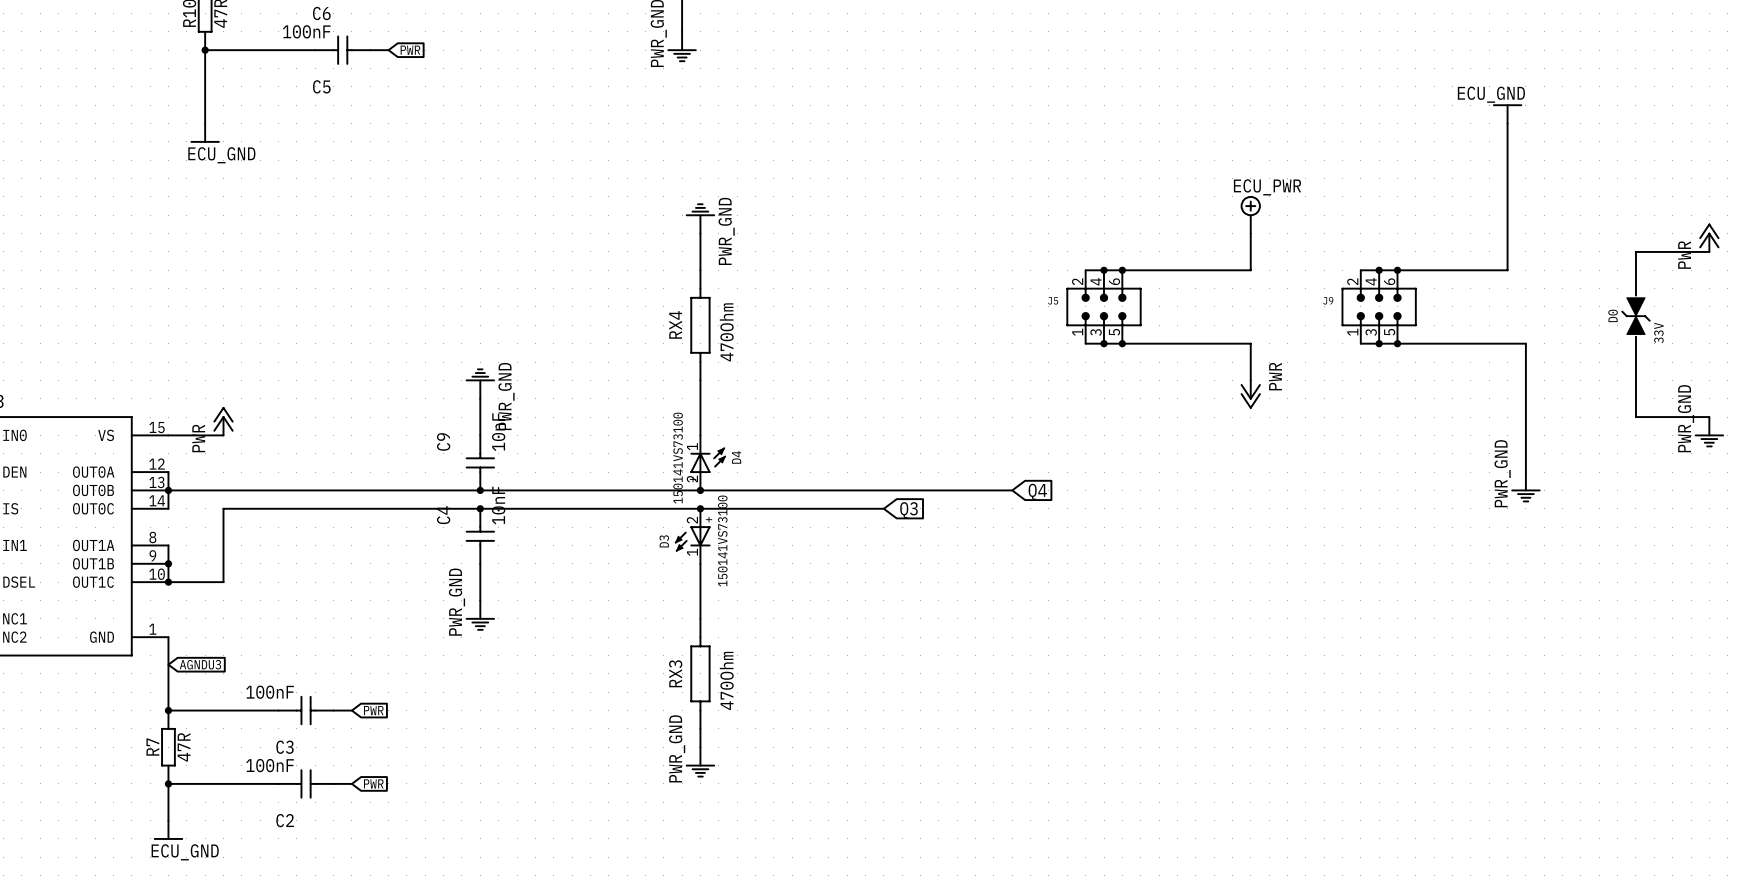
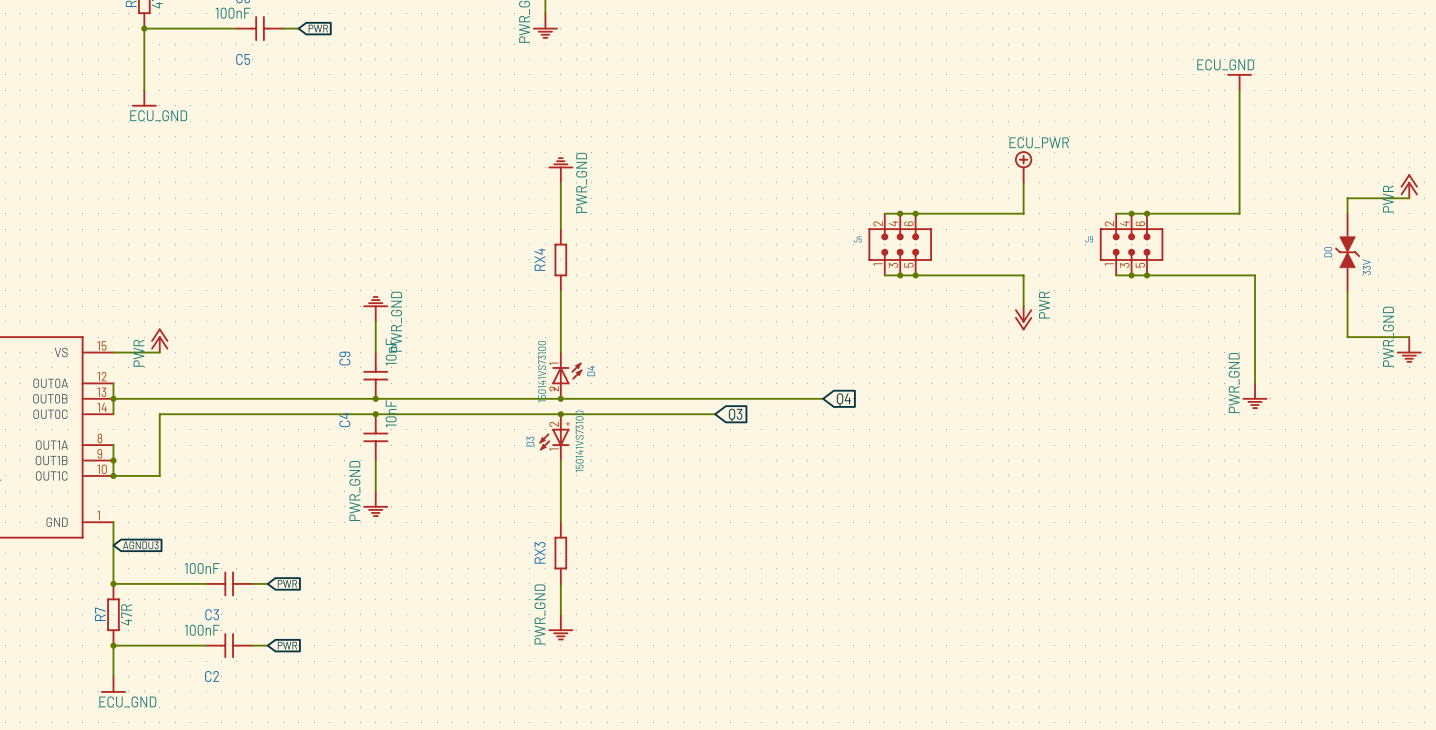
RX4 symbol: [690, 270, 711, 381] -> [554, 229, 567, 291]
RX4 value: 470Ohm (726, 332) -> none
RX3 symbol: [690, 618, 711, 729] -> [554, 522, 567, 584]
RX3 value: 470Ohm (726, 680) -> none

